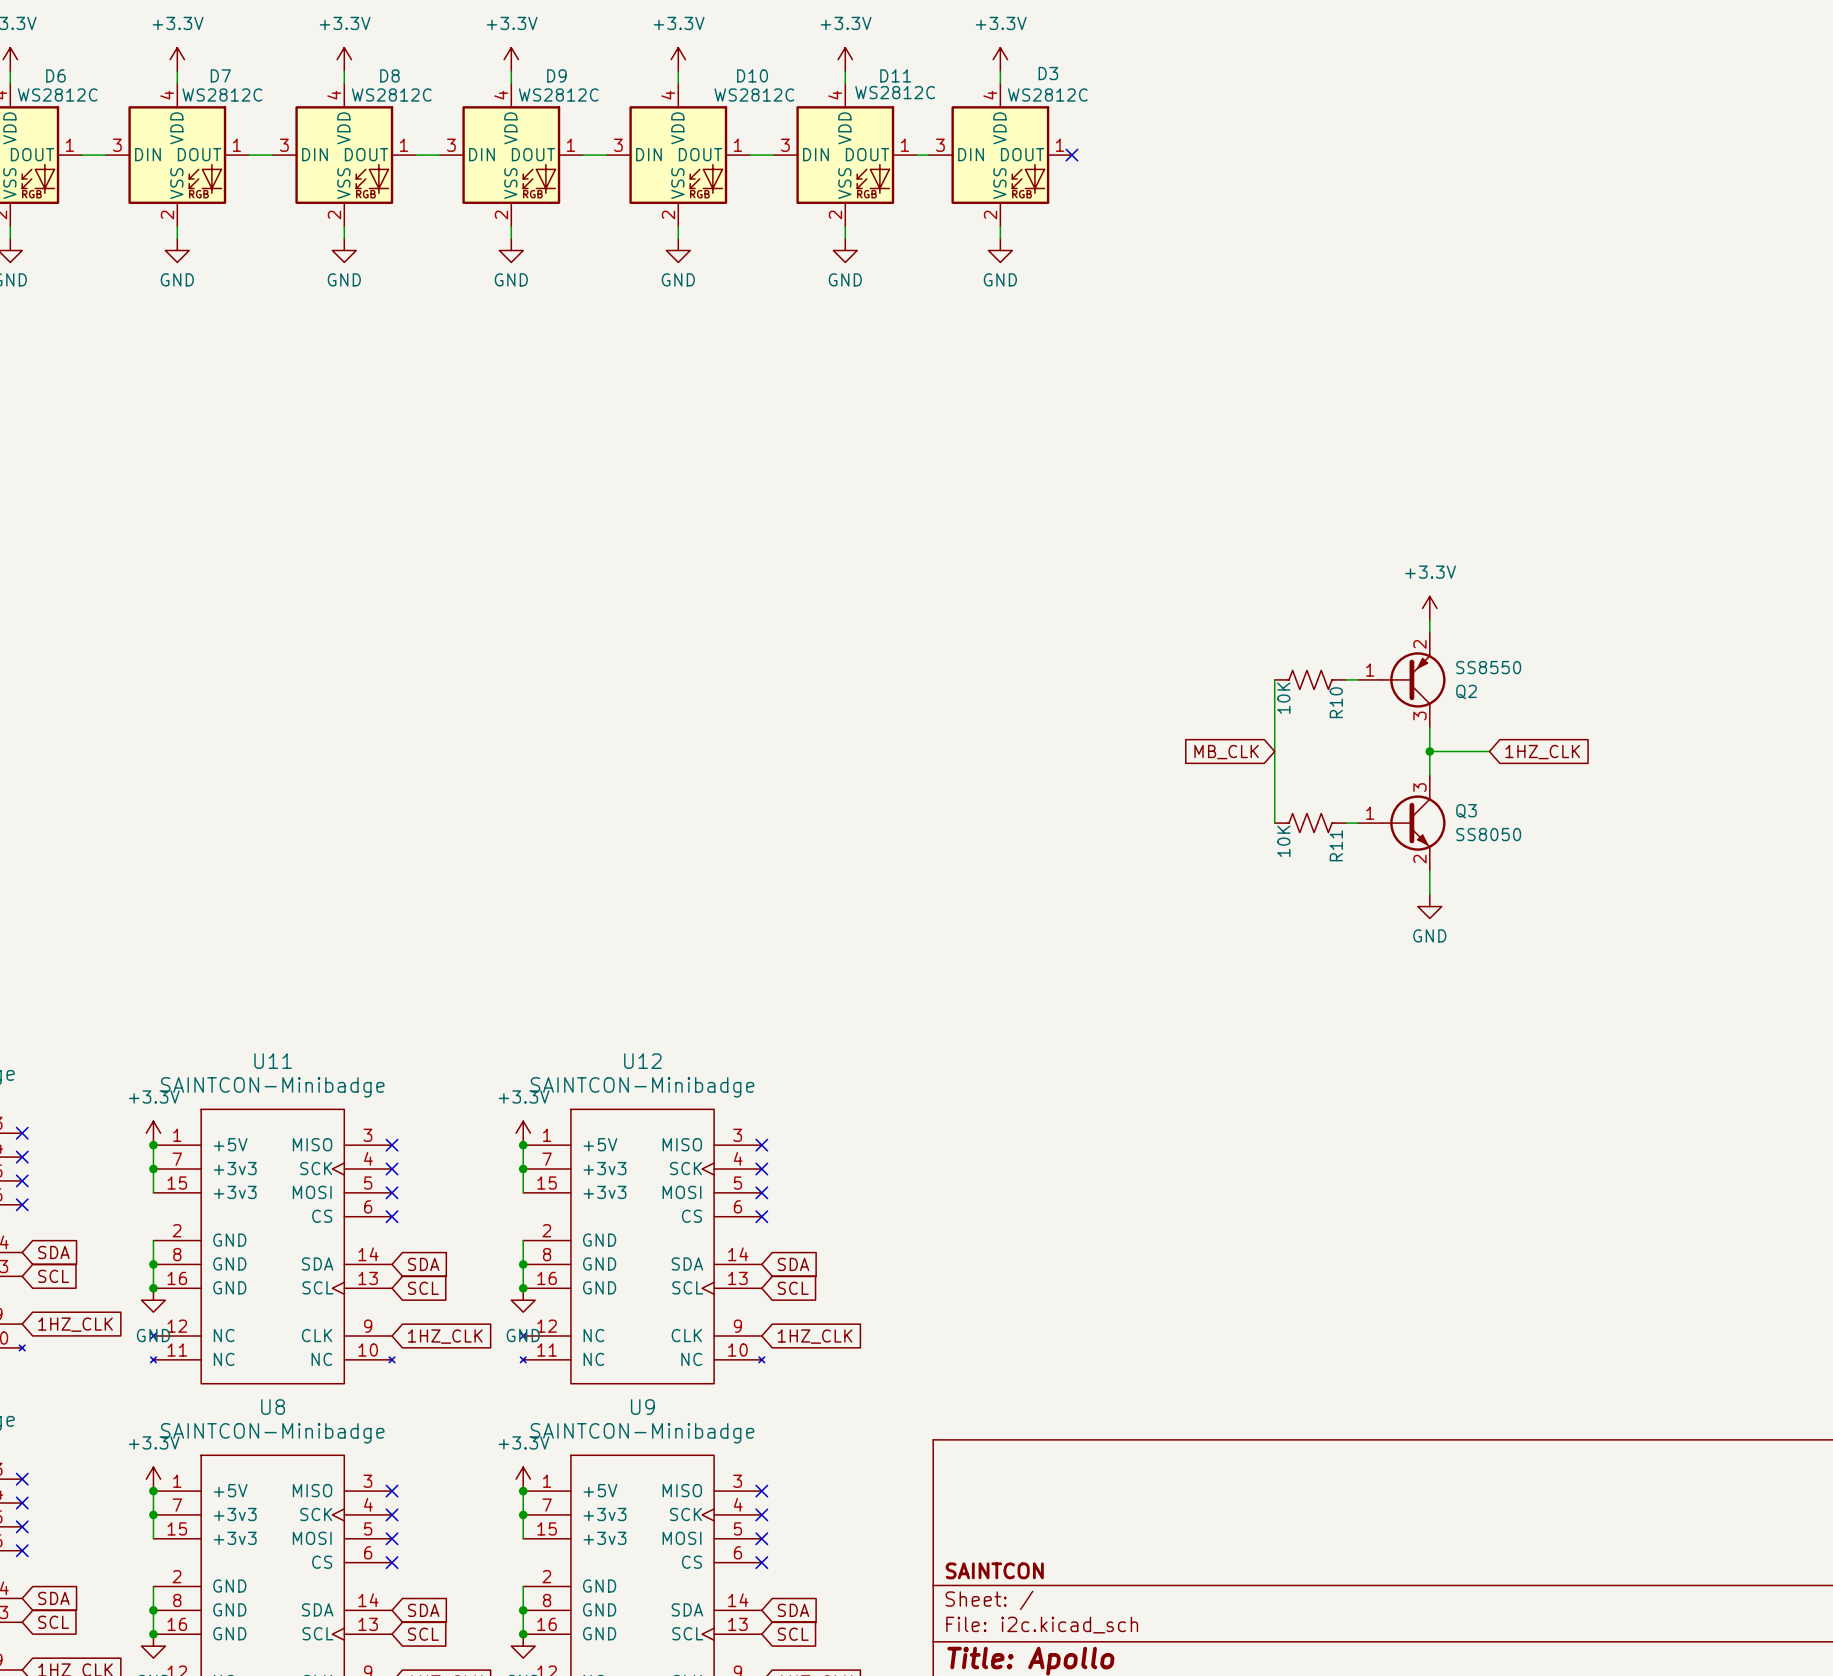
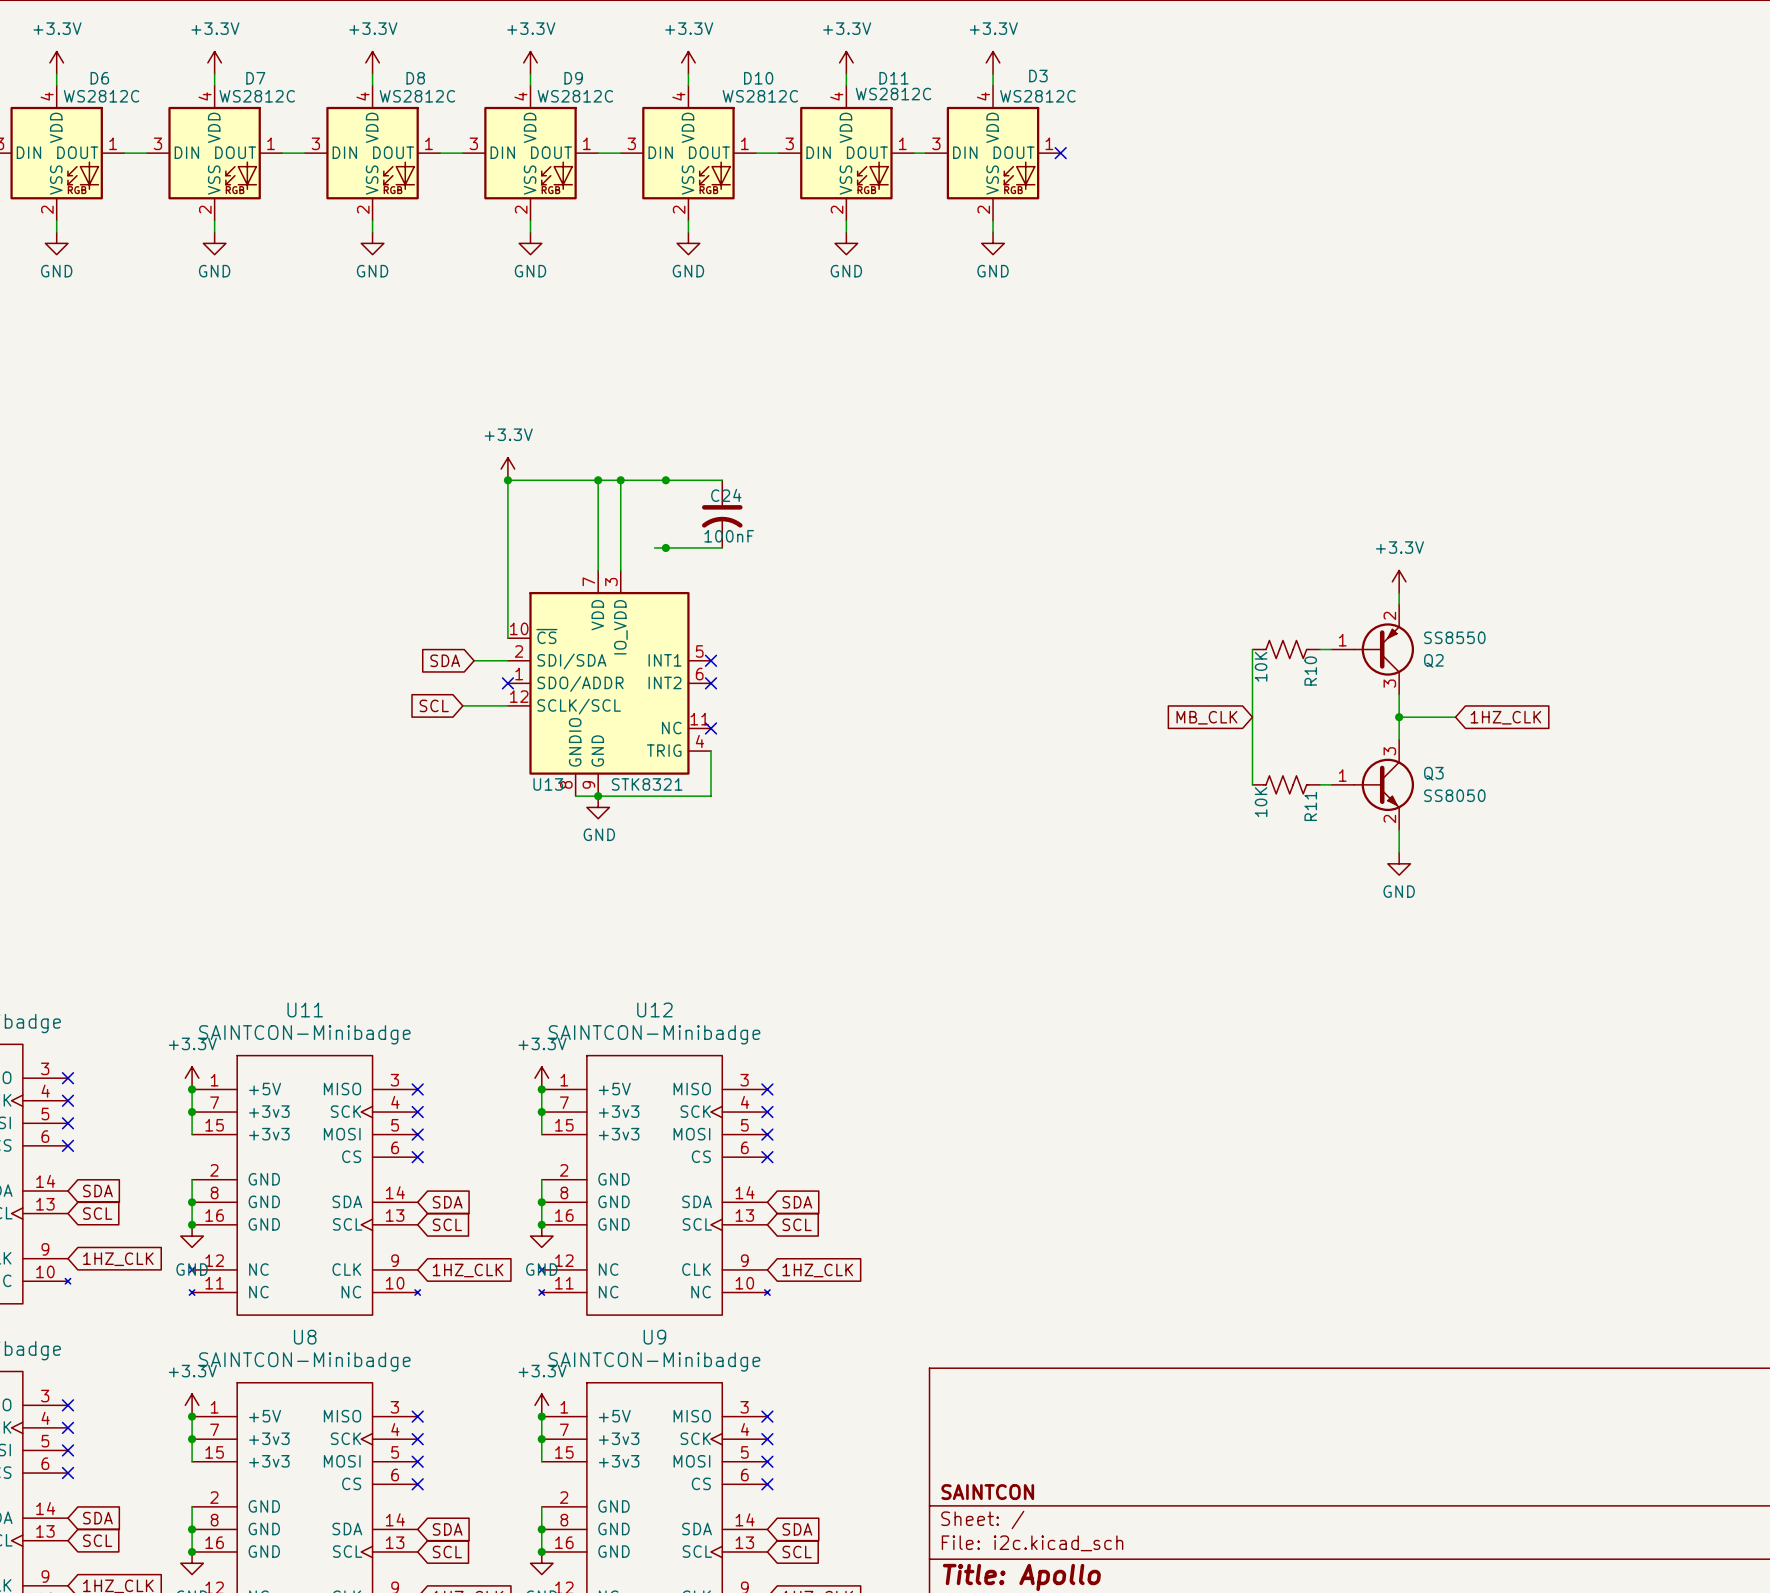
power symbol: none -> +3.3V (507, 469)
junction: none -> (507, 480)
wire: none -> (598, 480) (598, 570)
junction: none -> (598, 480)
wire: none -> (620, 480) (620, 570)
junction: none -> (620, 480)
junction: none -> (665, 480)
wire: none -> (722, 480) (507, 480) (507, 638)
C24: none -> 100nF (722, 514)
wire: none -> (654, 547) (722, 547)
junction: none -> (665, 547)
global label: none -> SDA (445, 660)
wire: none -> (474, 660) (507, 660)
no-connect mark: none -> (710, 660)
no-connect mark: none -> (507, 683)
U13: none -> STK8321 (609, 683)
no-connect mark: none -> (710, 683)
global label: none -> SCL (434, 705)
wire: none -> (462, 705) (507, 705)
no-connect mark: none -> (710, 728)
wire: none -> (710, 751) (710, 796) (575, 796)
junction: none -> (598, 796)
power symbol: none -> GND (598, 807)

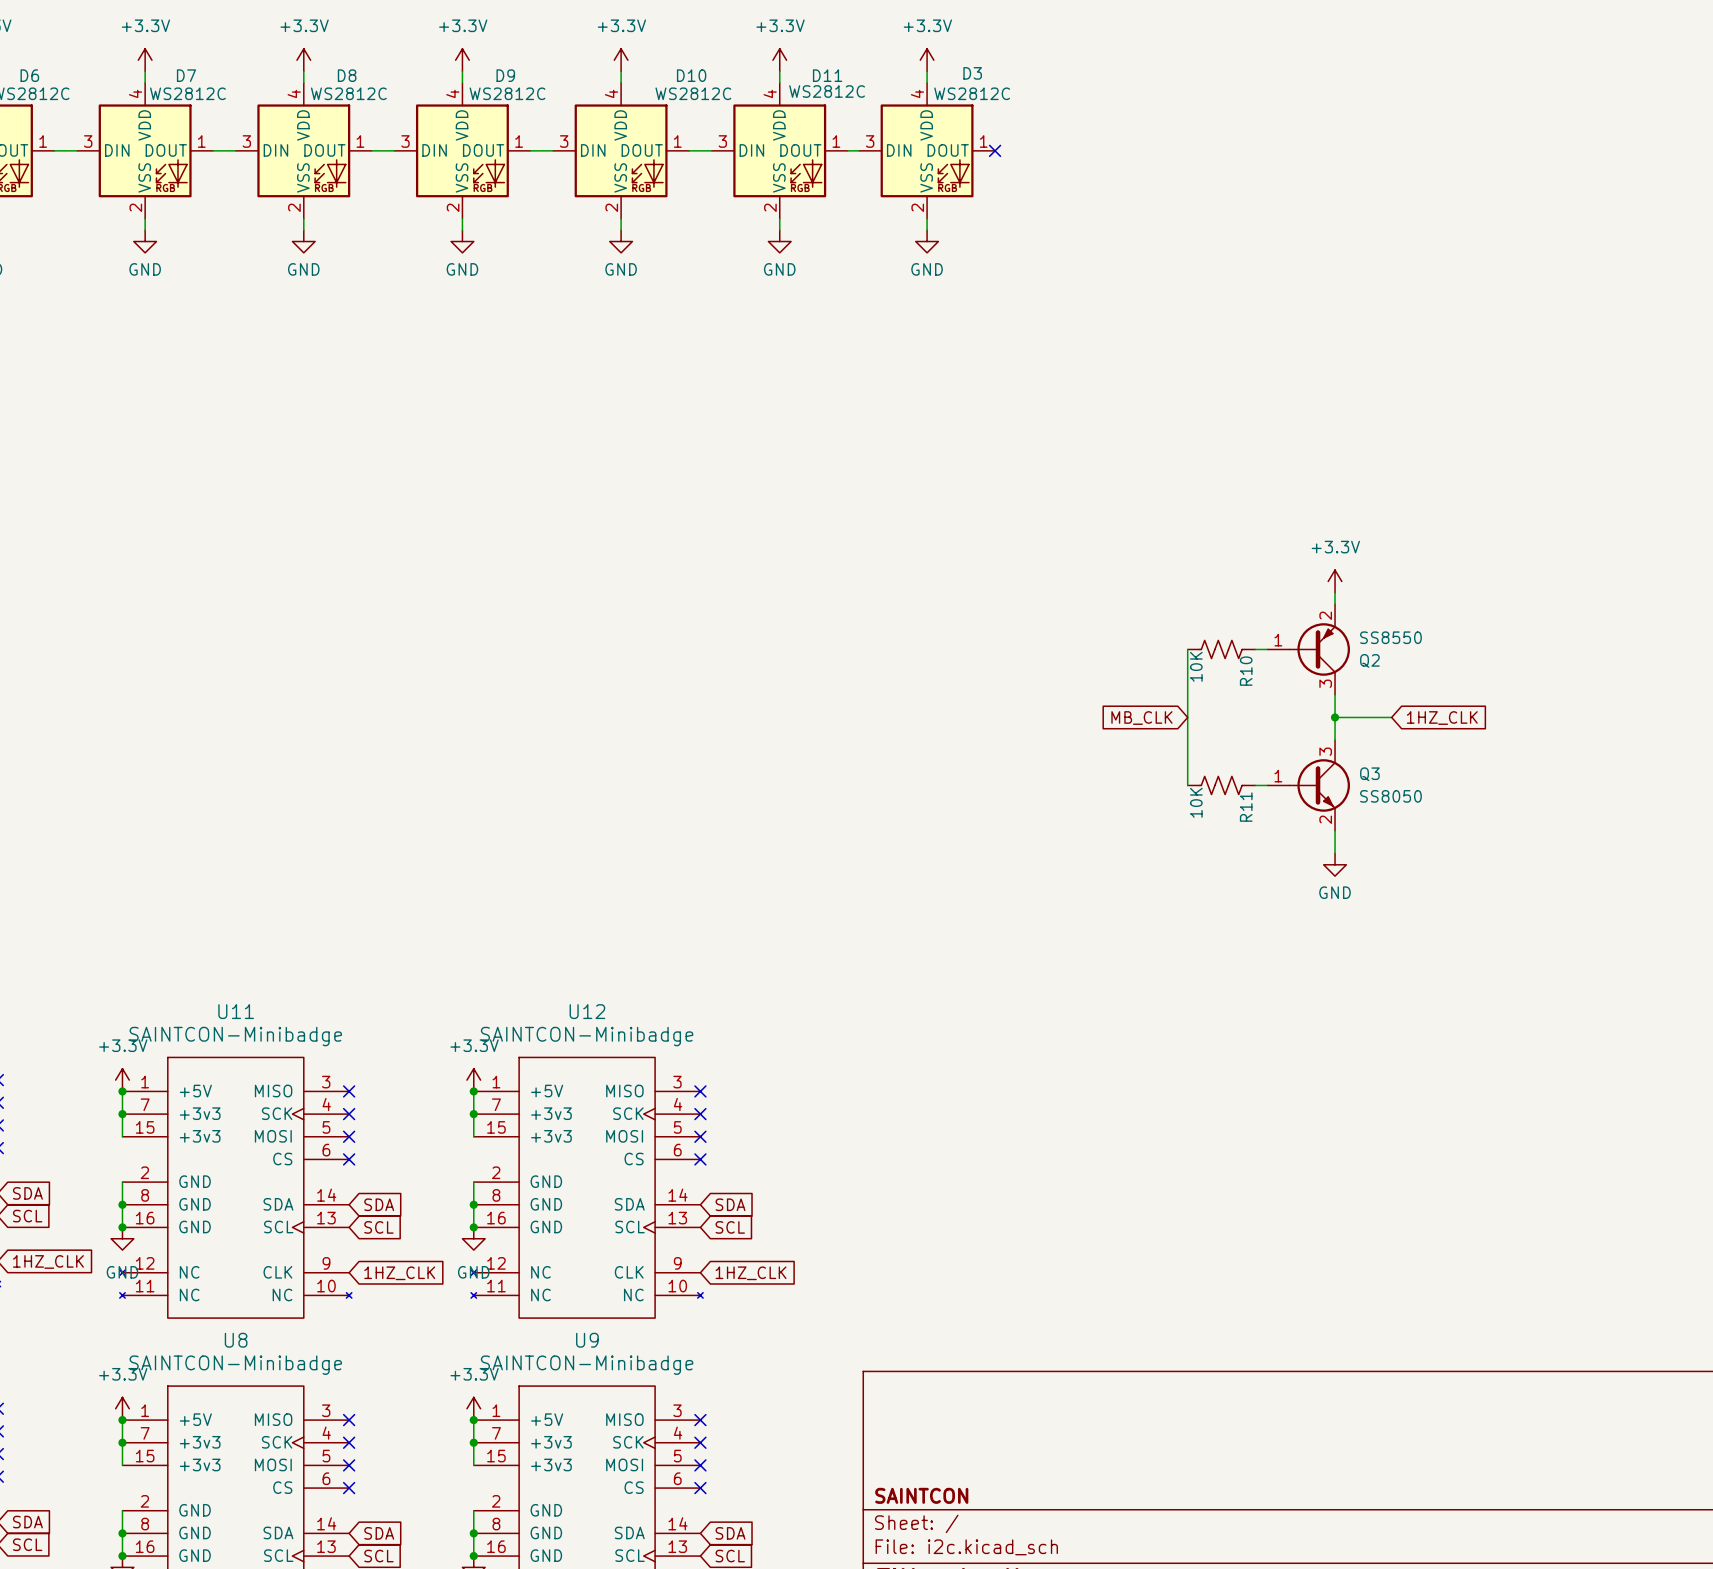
power symbol: +3.3V (507, 469) -> none
junction: (507, 480) -> none
wire: (598, 480) (598, 570) -> none
junction: (598, 480) -> none
wire: (620, 480) (620, 570) -> none
junction: (620, 480) -> none
junction: (665, 480) -> none
wire: (722, 480) (507, 480) (507, 638) -> none
C24: 100nF (722, 514) -> none
wire: (654, 547) (722, 547) -> none
junction: (665, 547) -> none
global label: SDA (445, 660) -> none
wire: (474, 660) (507, 660) -> none
no-connect mark: (710, 660) -> none
no-connect mark: (507, 683) -> none
U13: STK8321 (609, 683) -> none
no-connect mark: (710, 683) -> none
global label: SCL (434, 705) -> none
wire: (462, 705) (507, 705) -> none
no-connect mark: (710, 728) -> none
wire: (710, 751) (710, 796) (575, 796) -> none
junction: (598, 796) -> none
power symbol: GND (598, 807) -> none

